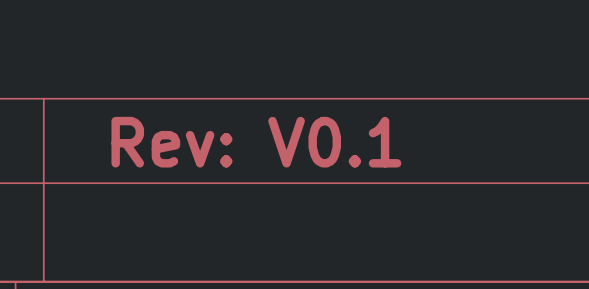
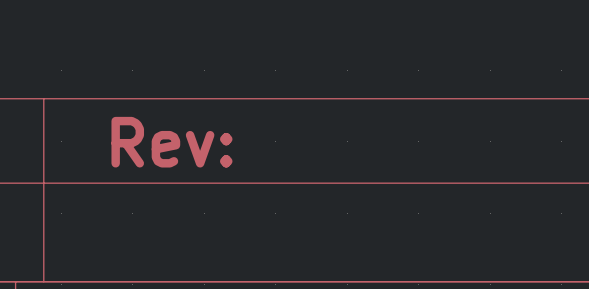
title block: Rev: V0.1 (256, 142) -> Rev: (171, 142)

